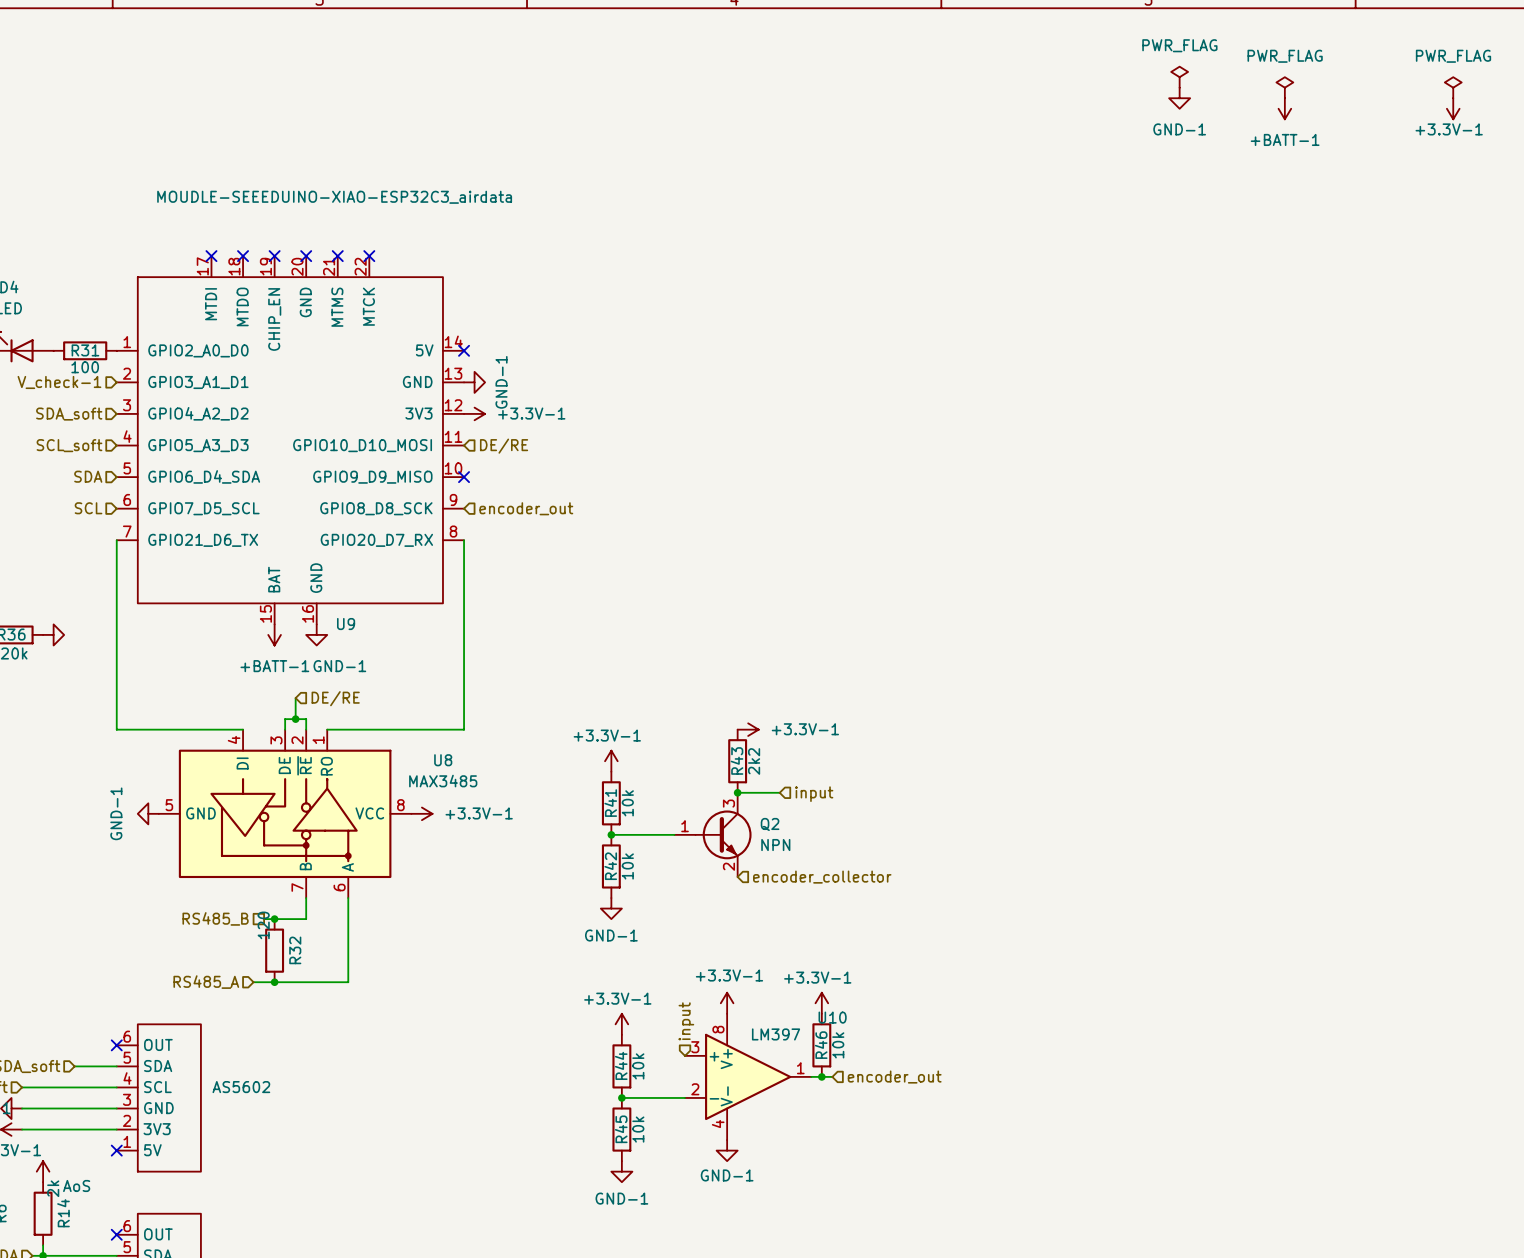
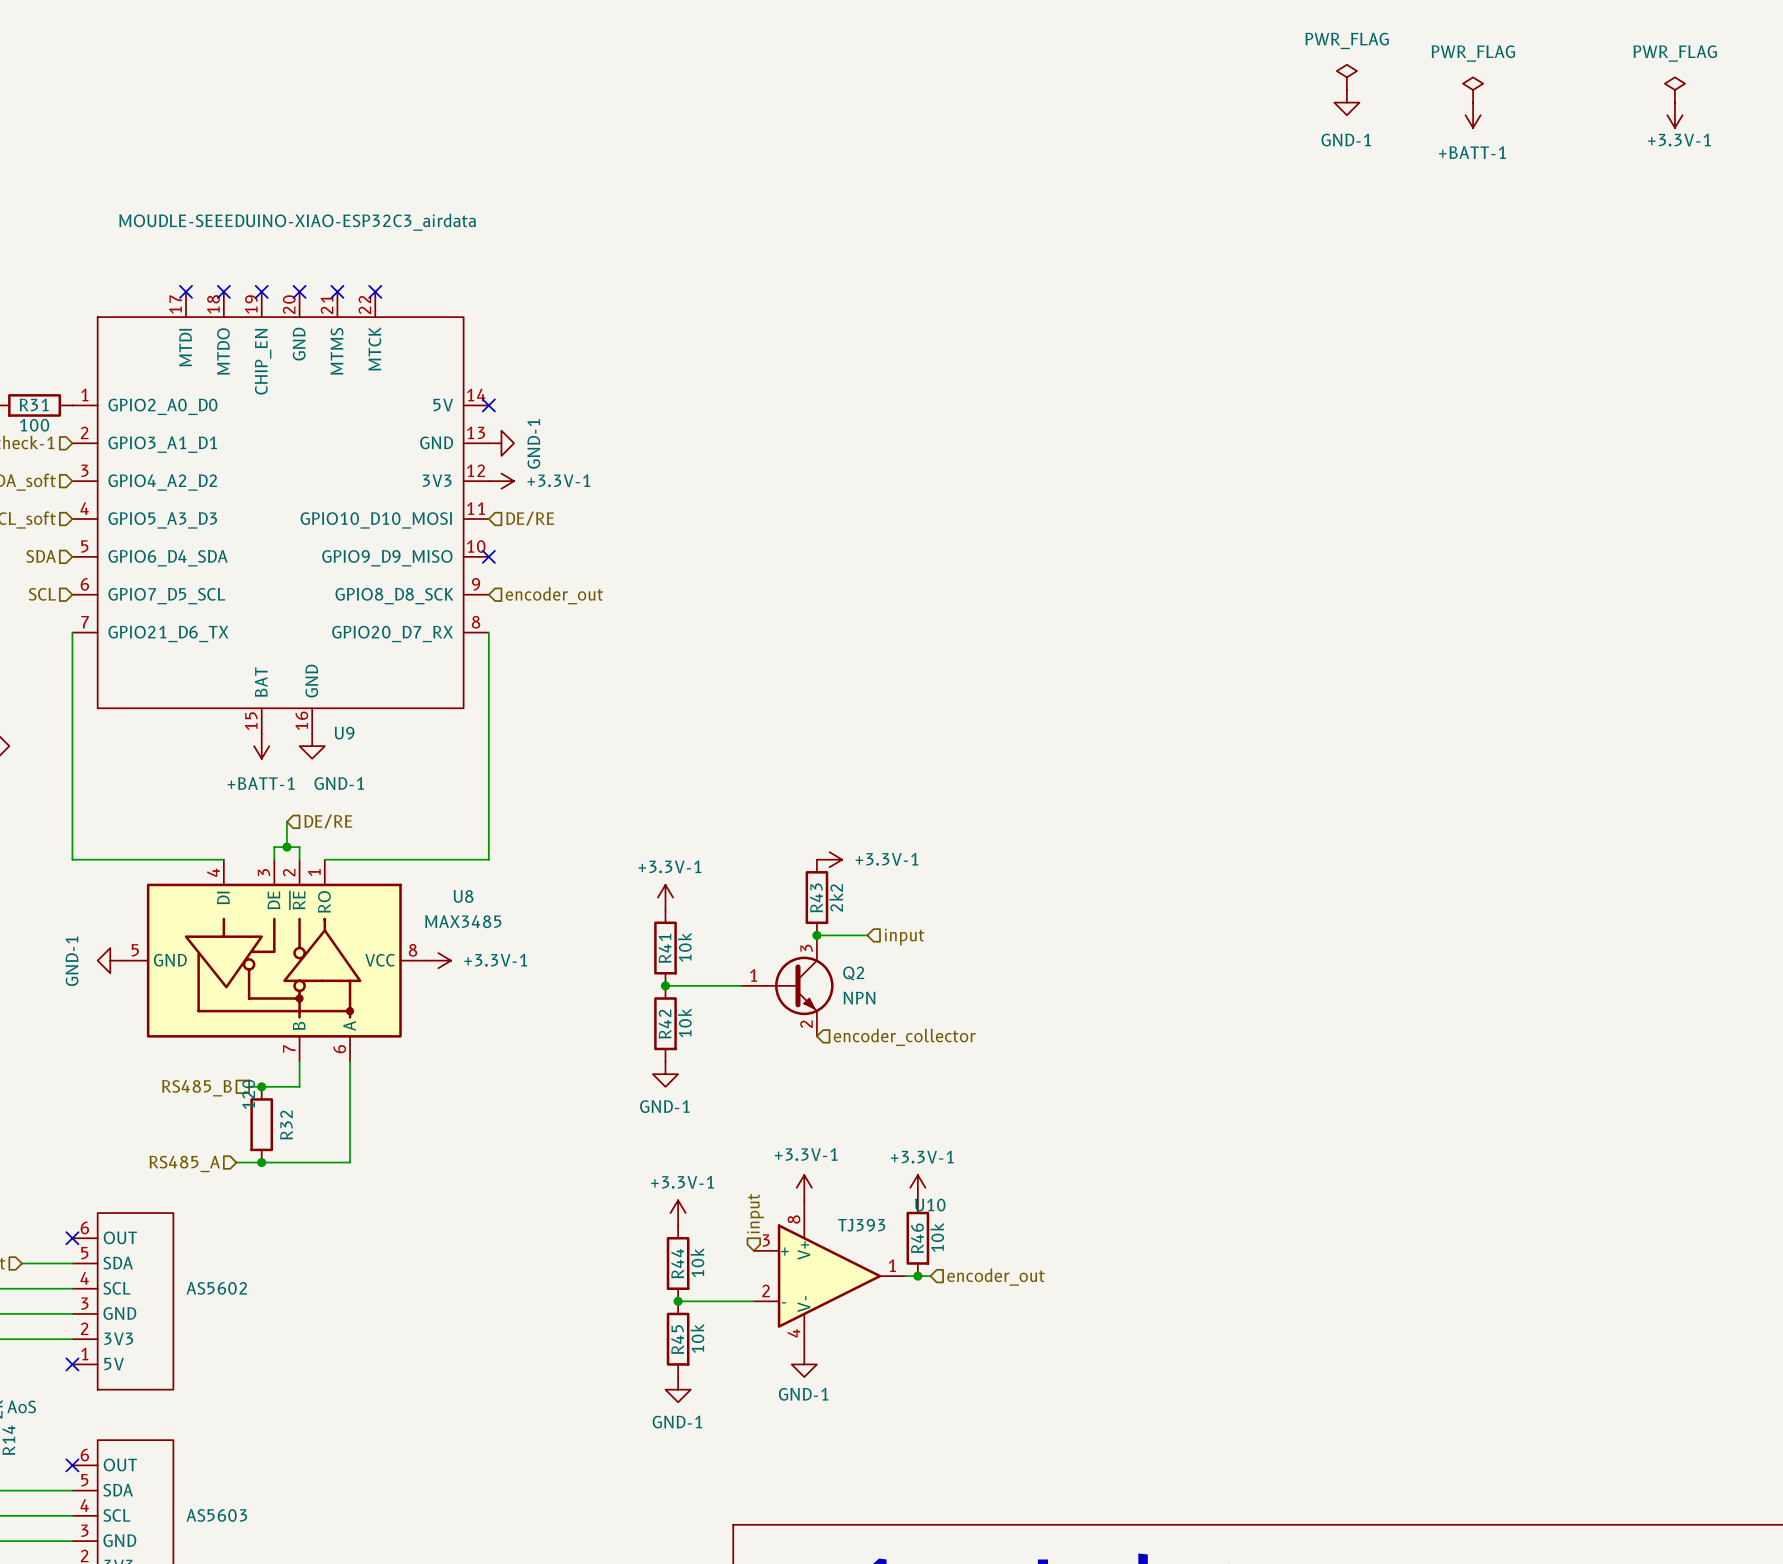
U10 value: LM397 (776, 1034) -> TJ393 (861, 1225)

